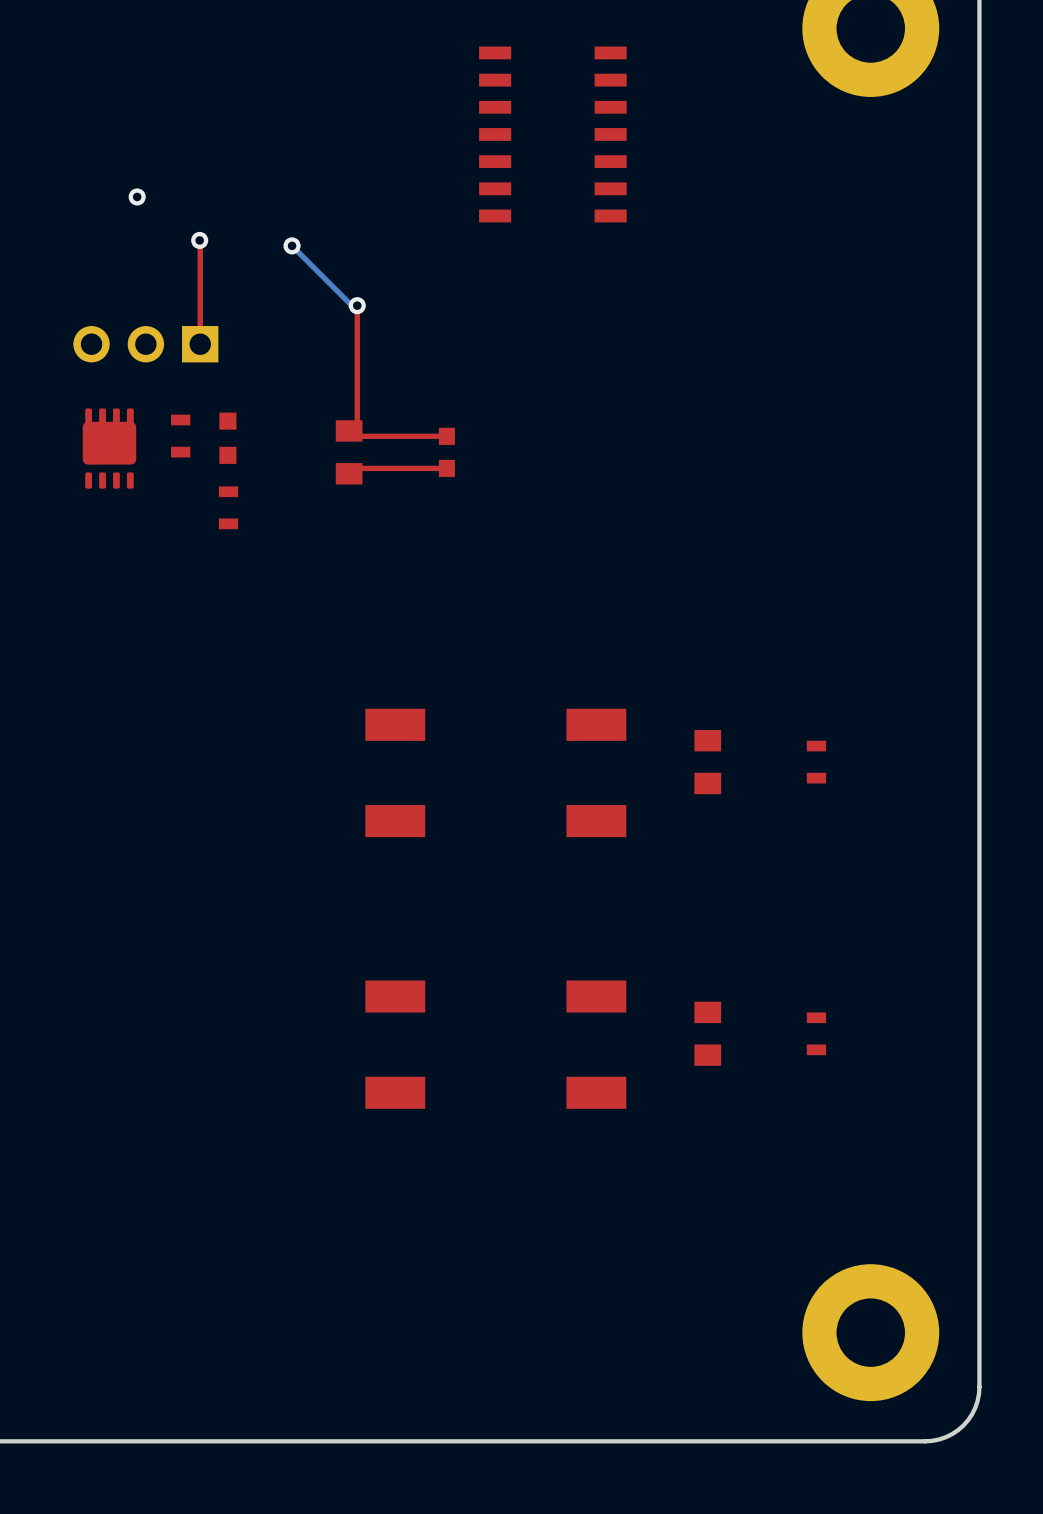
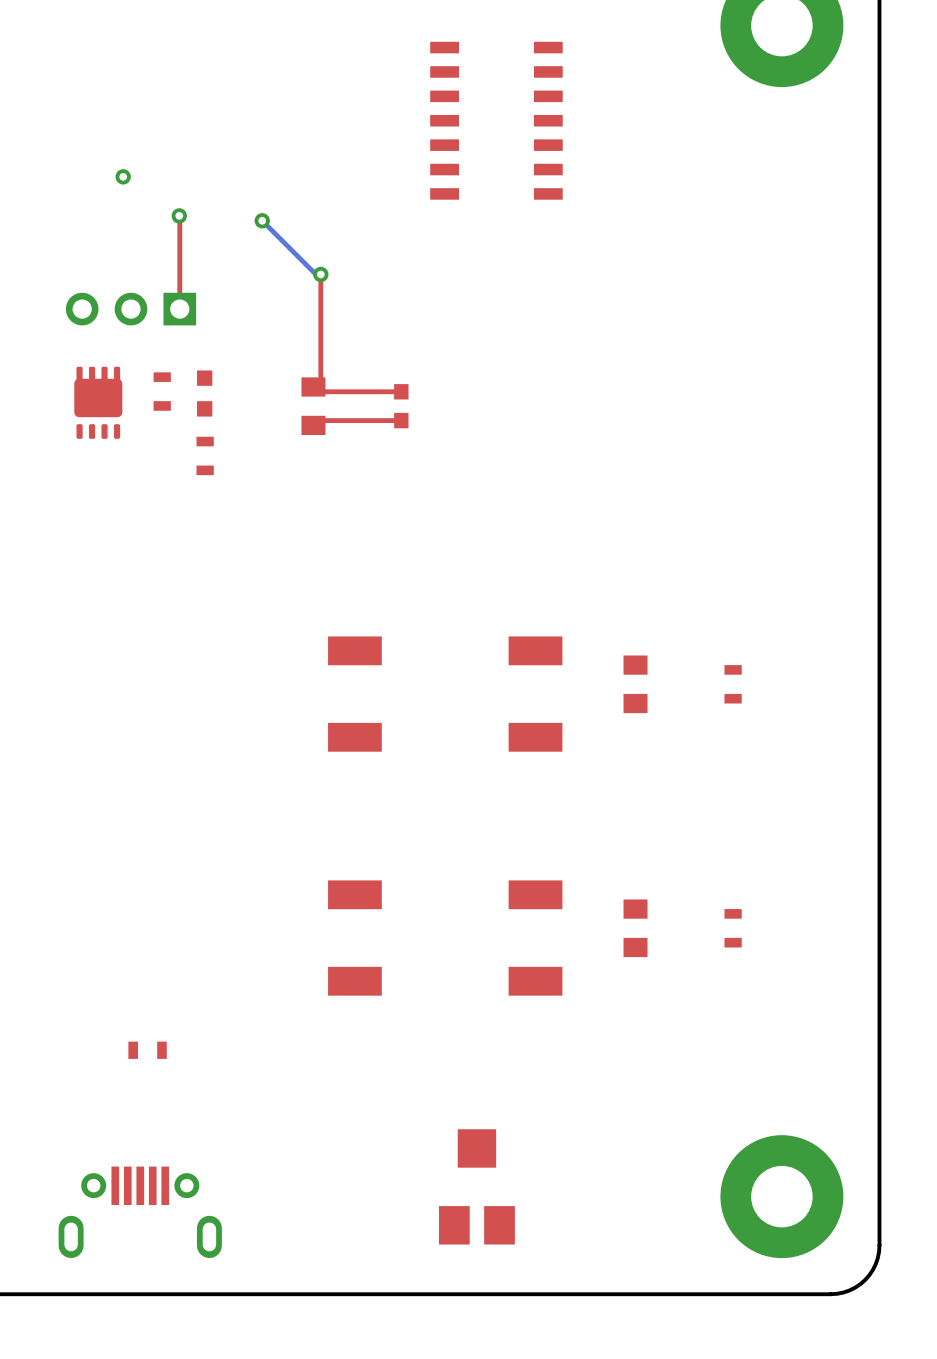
part: none -> (147, 1050)
part: none -> (476, 1186)
part: none -> (140, 1212)

